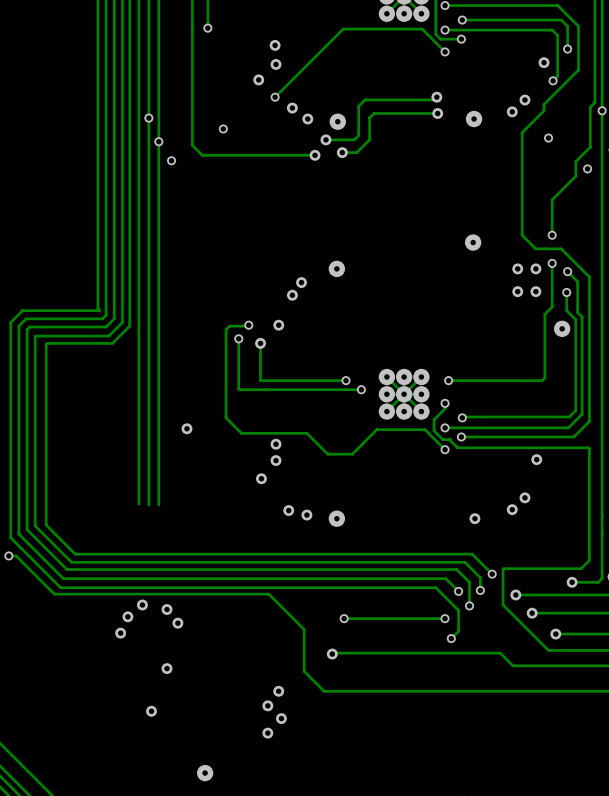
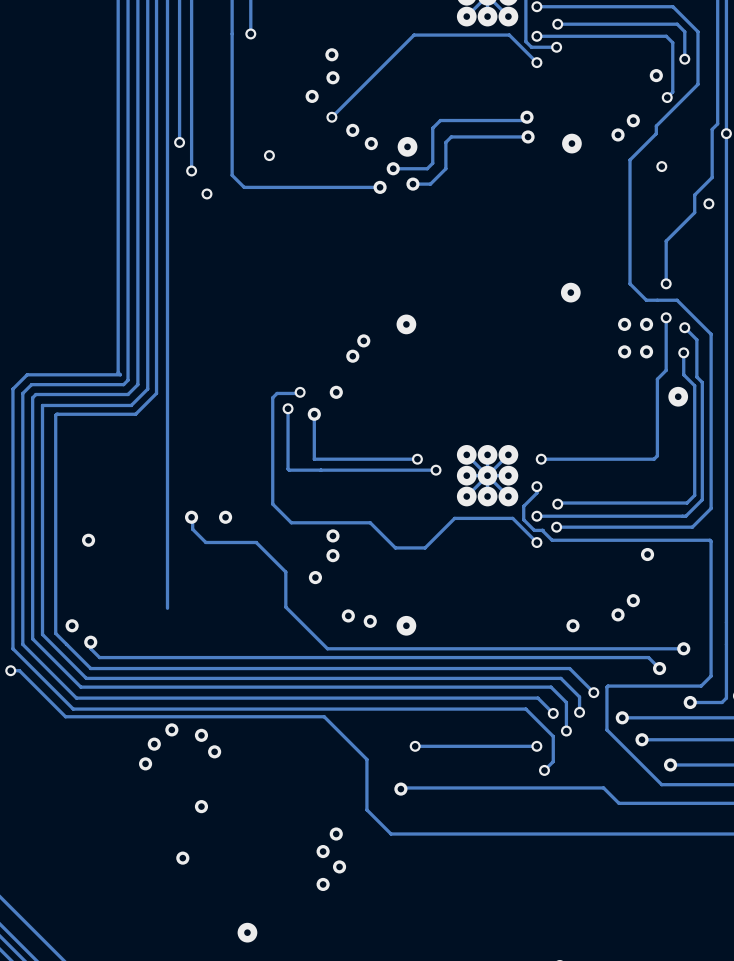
track: (148, 118) (148, 505) -> none
track: (158, 141) (158, 505) -> none
track: none -> (191, 517) (192, 529) (205, 542) (256, 542) (285, 572) (285, 607) (327, 648) (683, 648)
via: none -> (191, 517)
via: none -> (88, 540)
via: none -> (72, 625)
track: none -> (90, 642) (90, 648) (99, 657) (648, 657) (659, 668)
via: none -> (90, 642)
via: none -> (683, 648)
via: none -> (659, 668)

